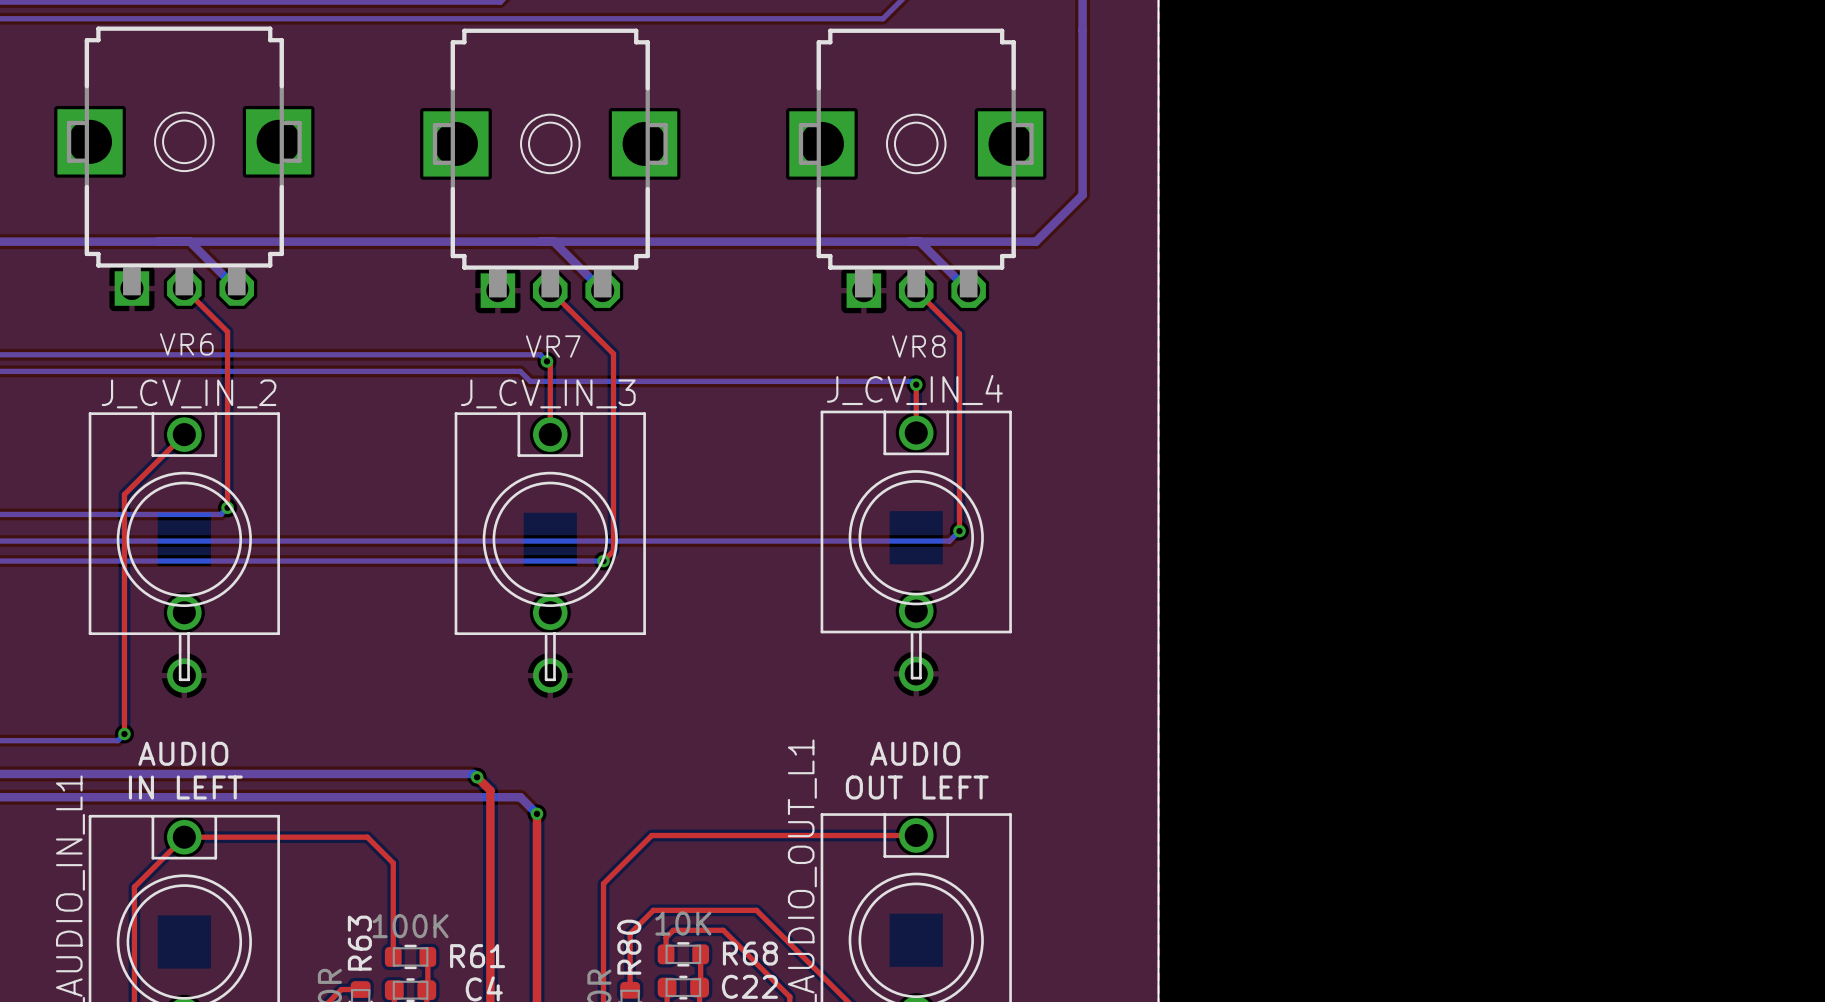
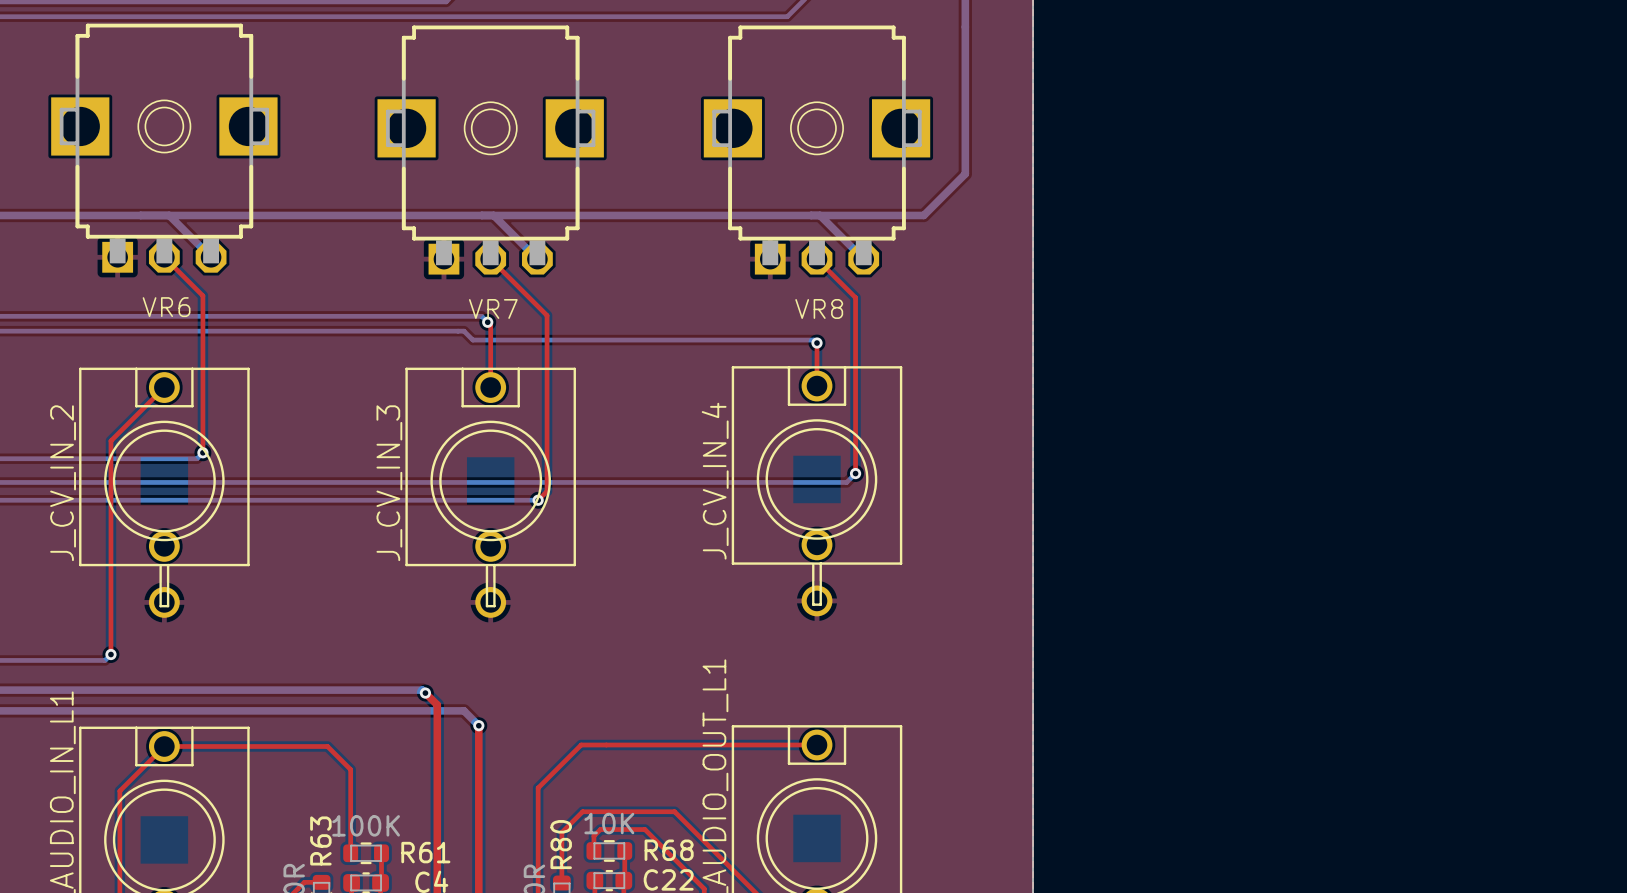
J_CV_IN_4 name rotation: 0° (914, 390) -> 90° counterclockwise (715, 481)
J_CV_IN_2 name rotation: 0° (189, 393) -> 90° counterclockwise (63, 483)
J_CV_IN_3 name rotation: 0° (548, 393) -> 90° counterclockwise (389, 483)
text: AUDIO (183, 753) -> none
text: AUDIO (915, 753) -> none
text: IN LEFT (185, 787) -> none
text: OUT LEFT (917, 787) -> none

